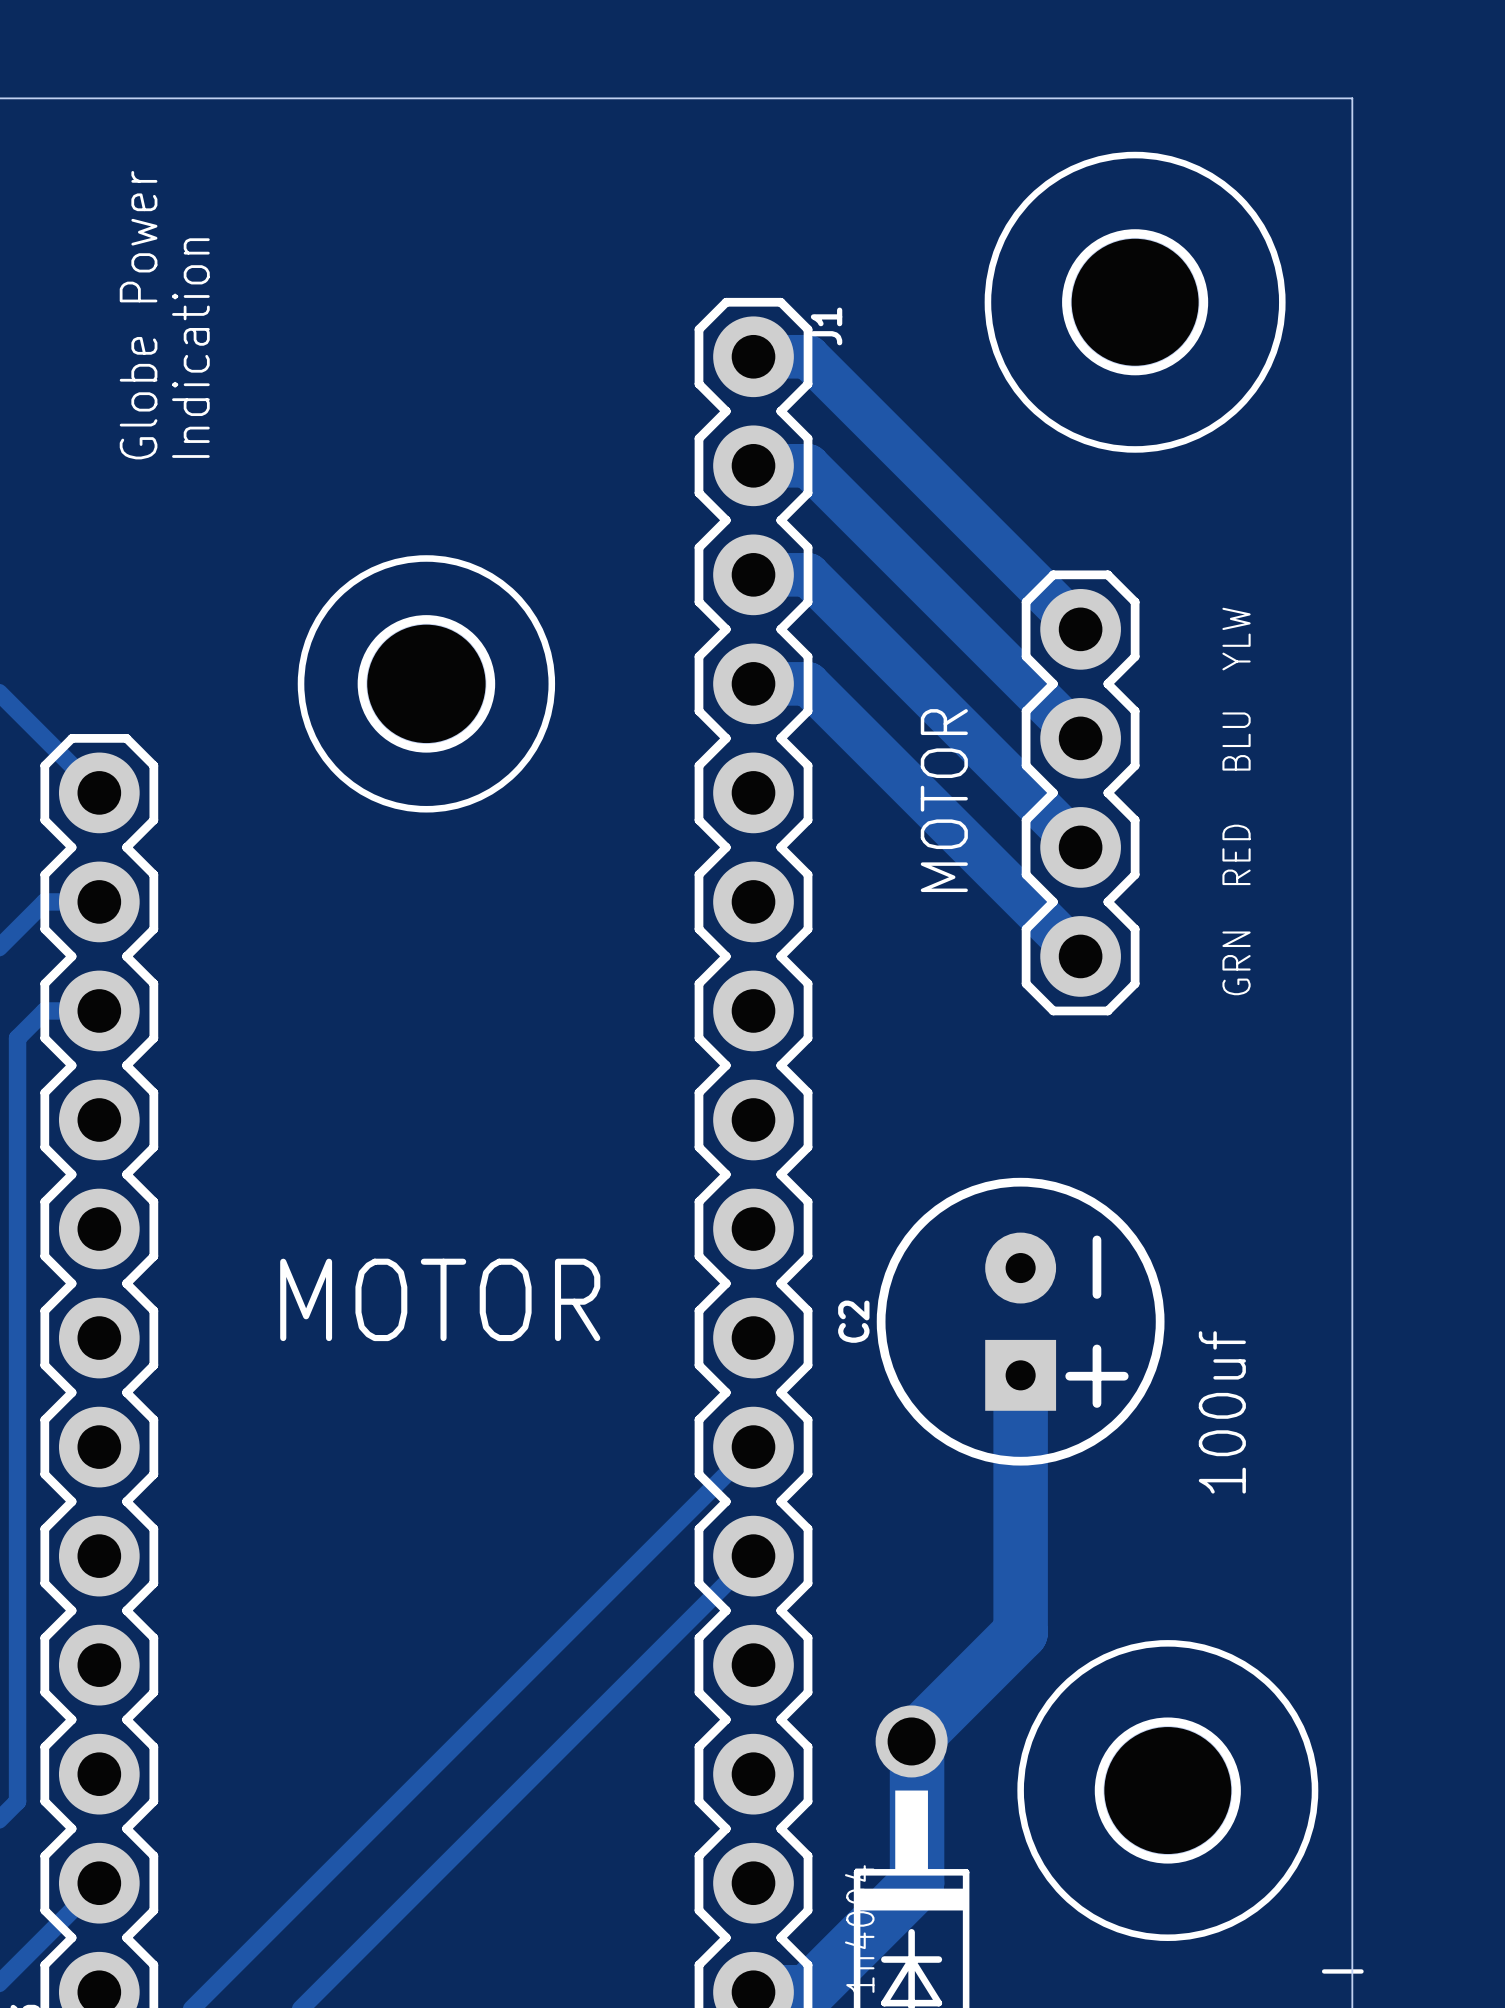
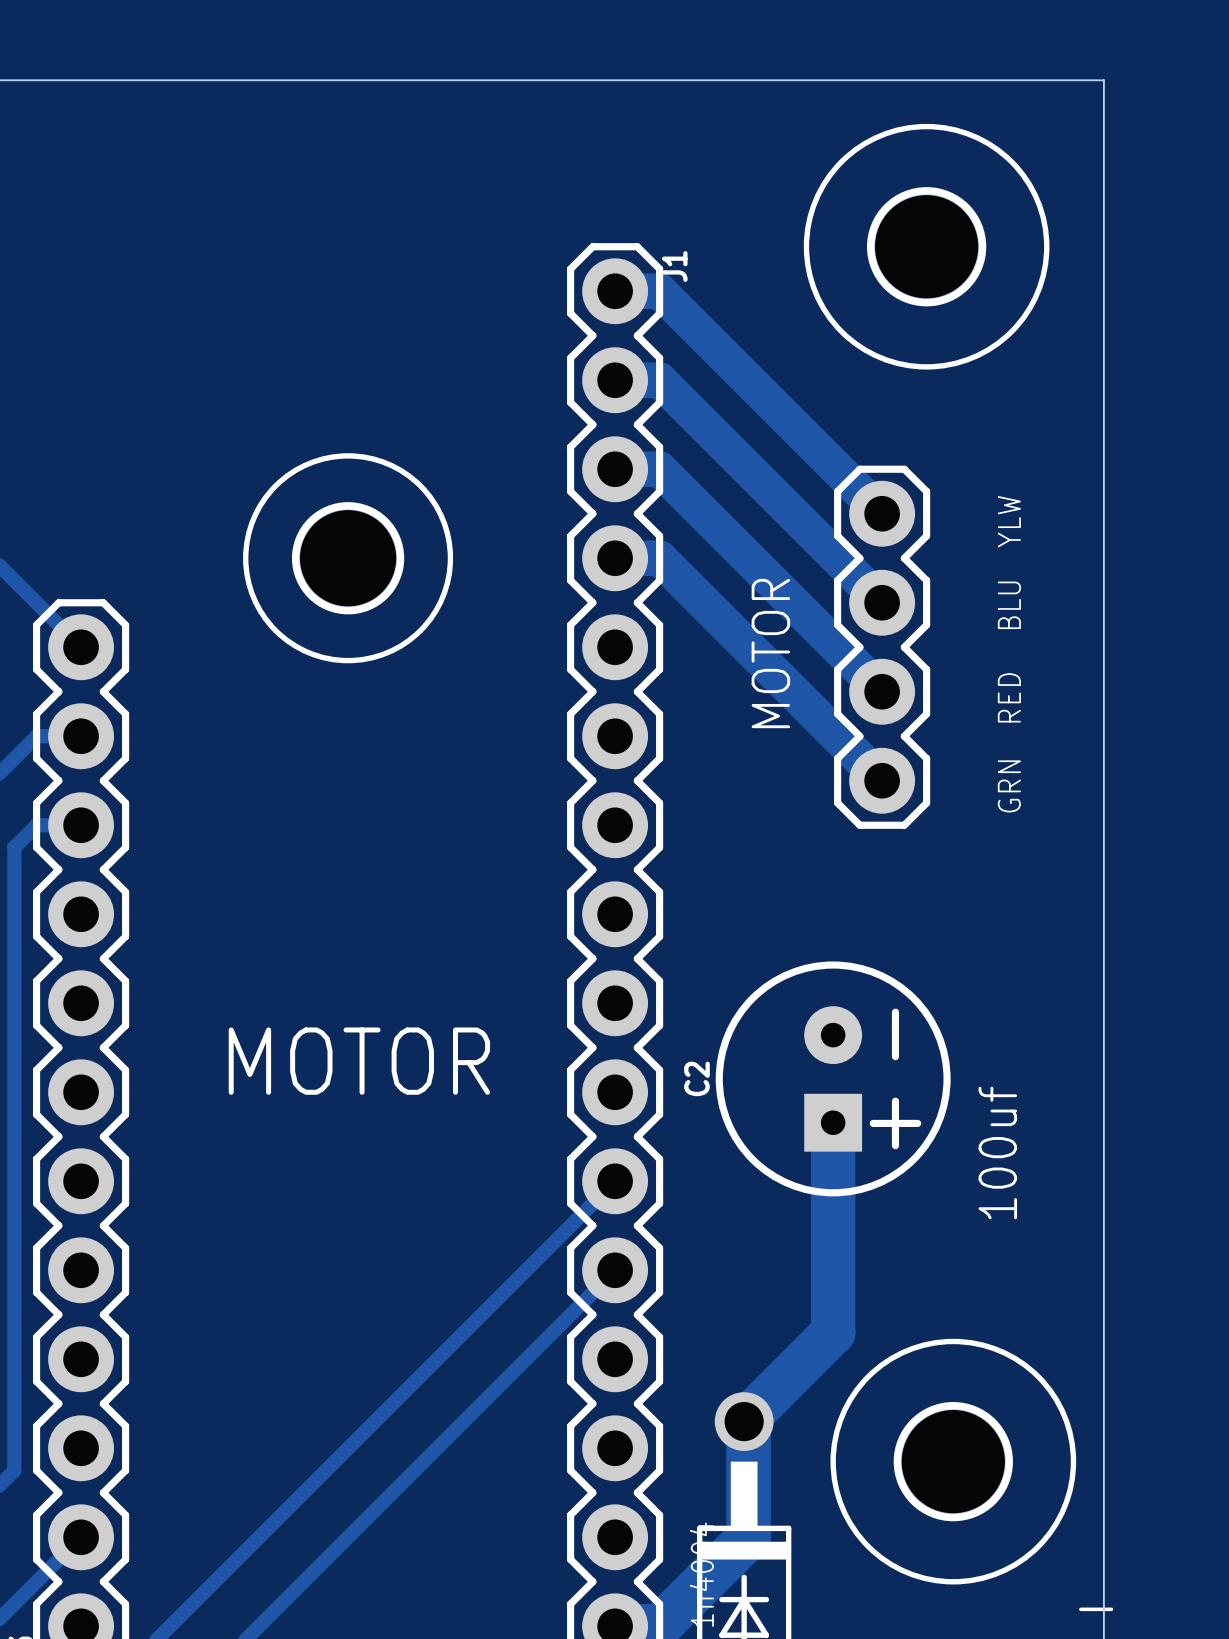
text: Globe Power (138, 315) -> none
text: Indication (190, 348) -> none

